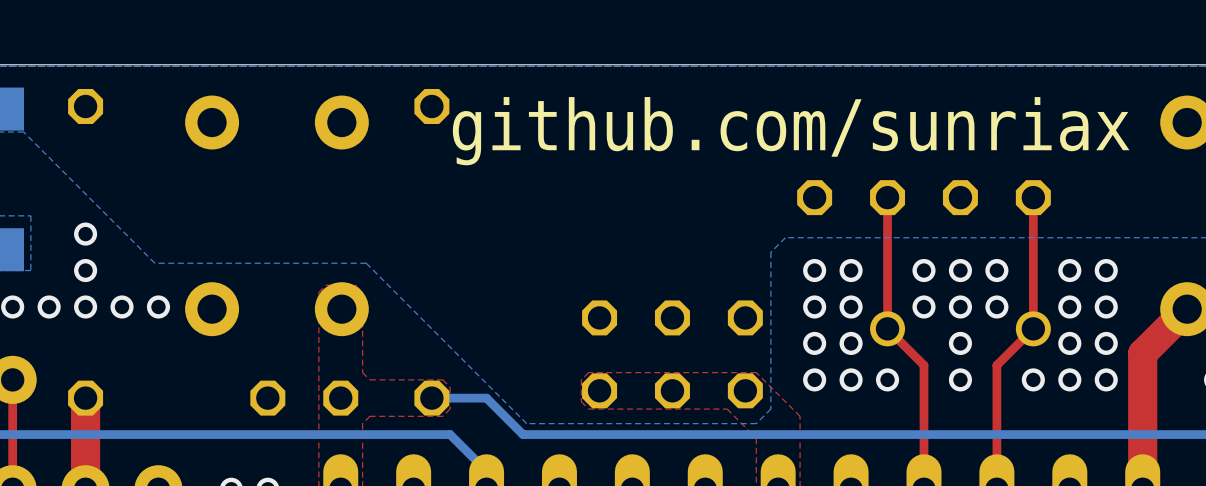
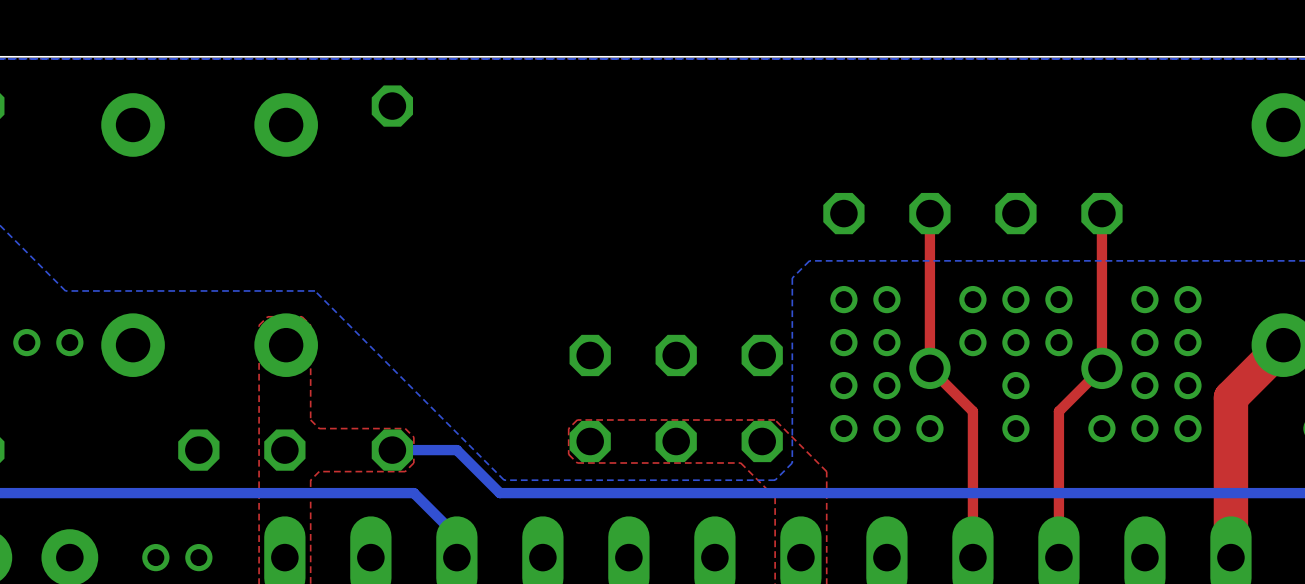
text: github.com/sunriax (791, 131) -> none

